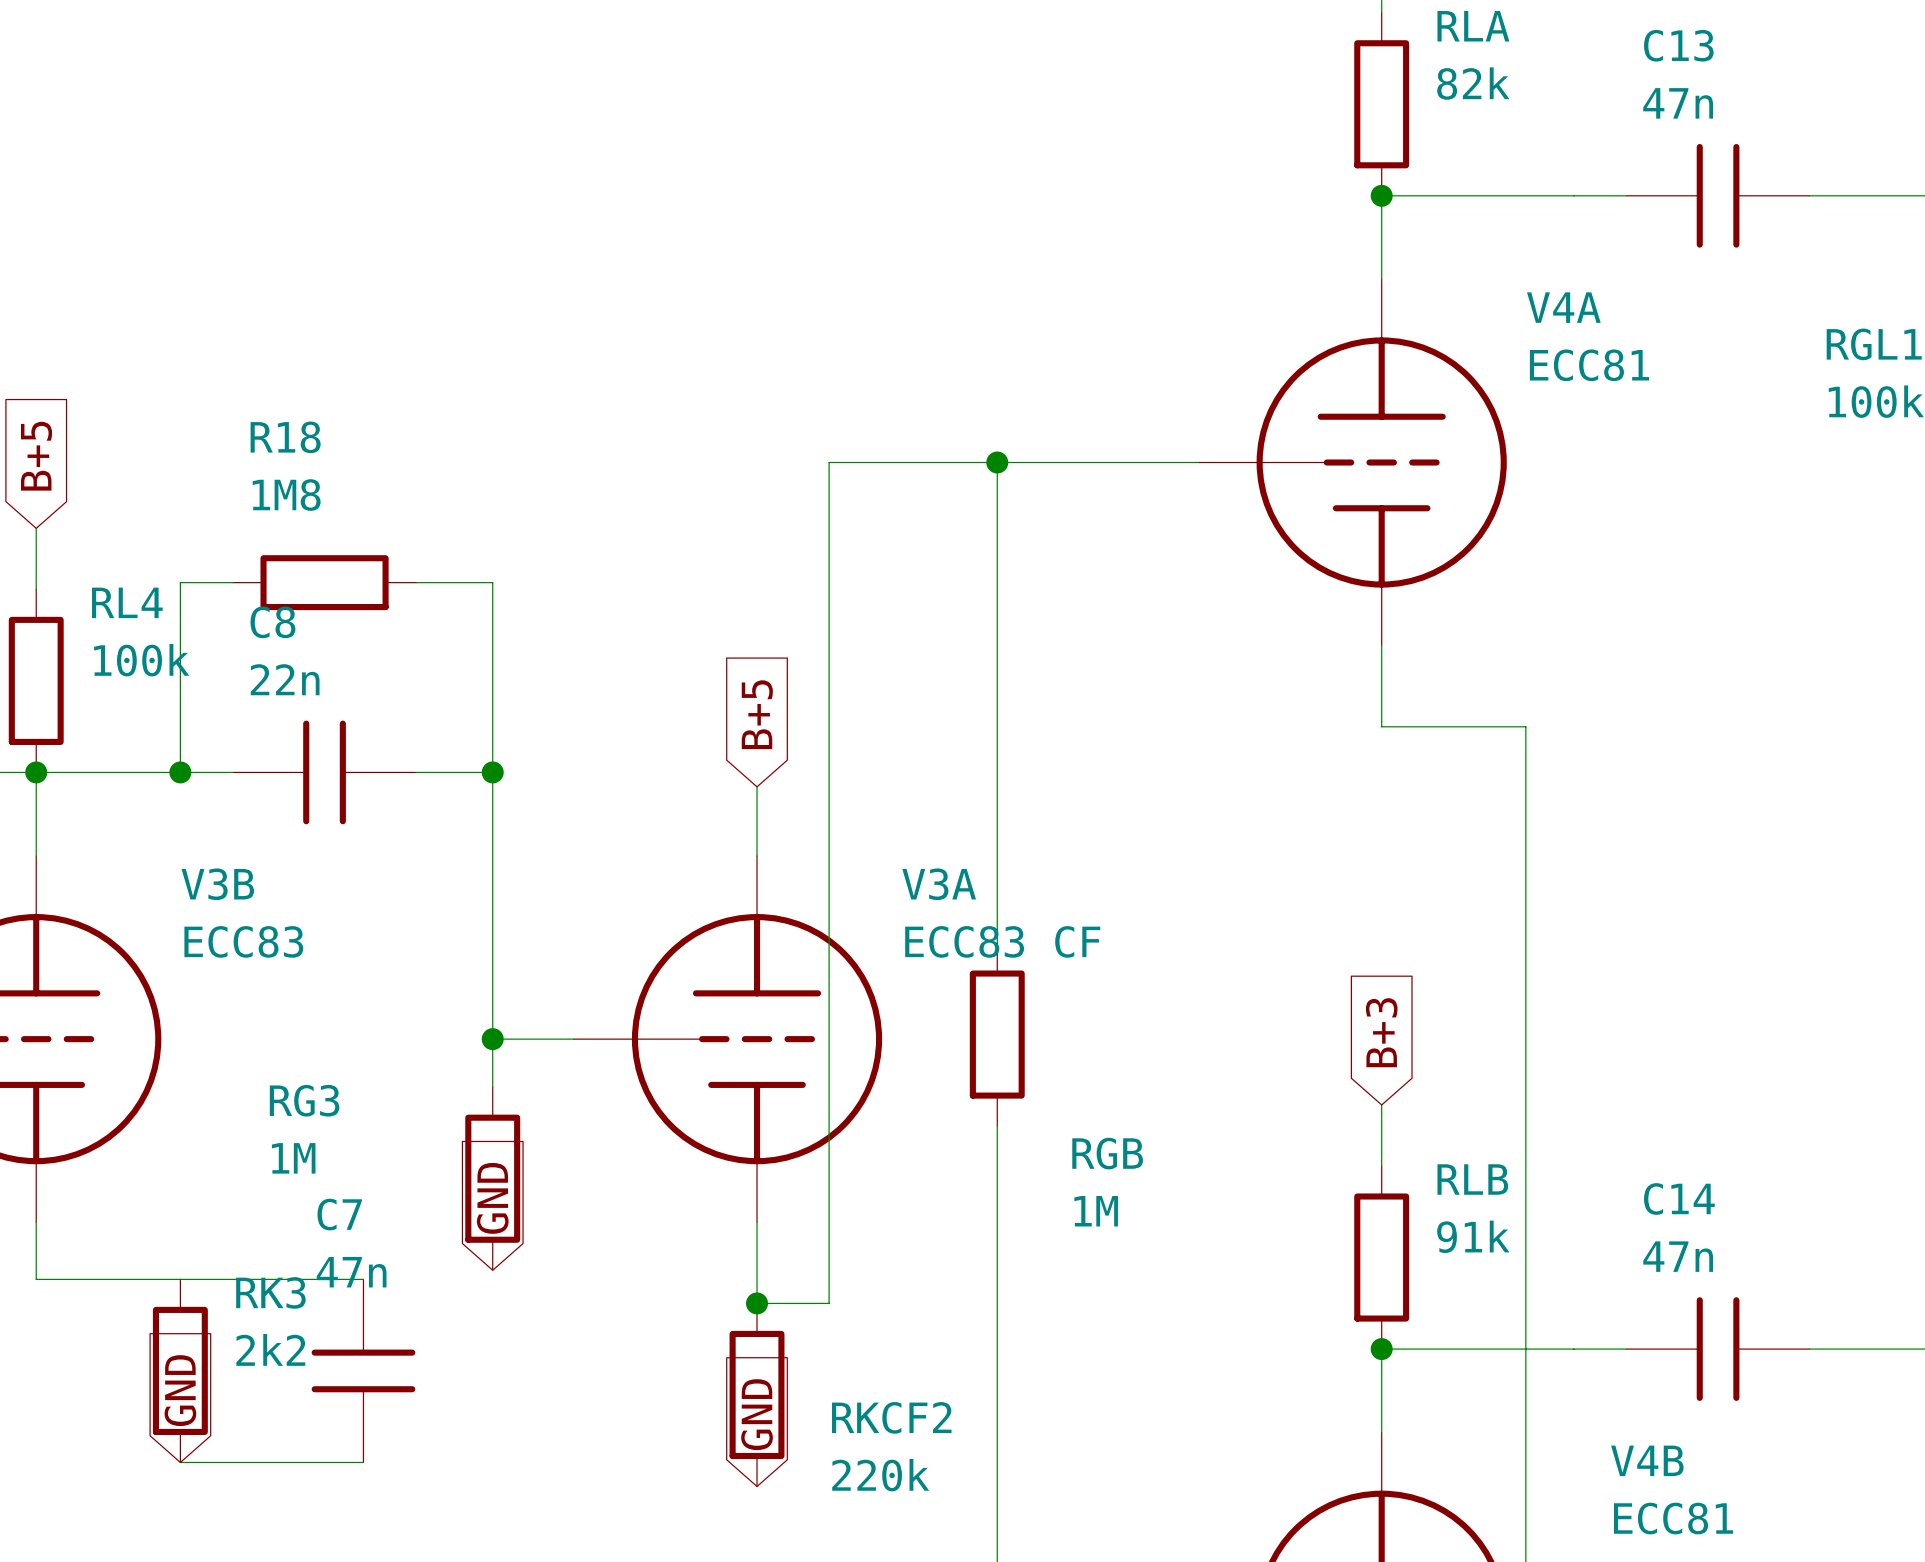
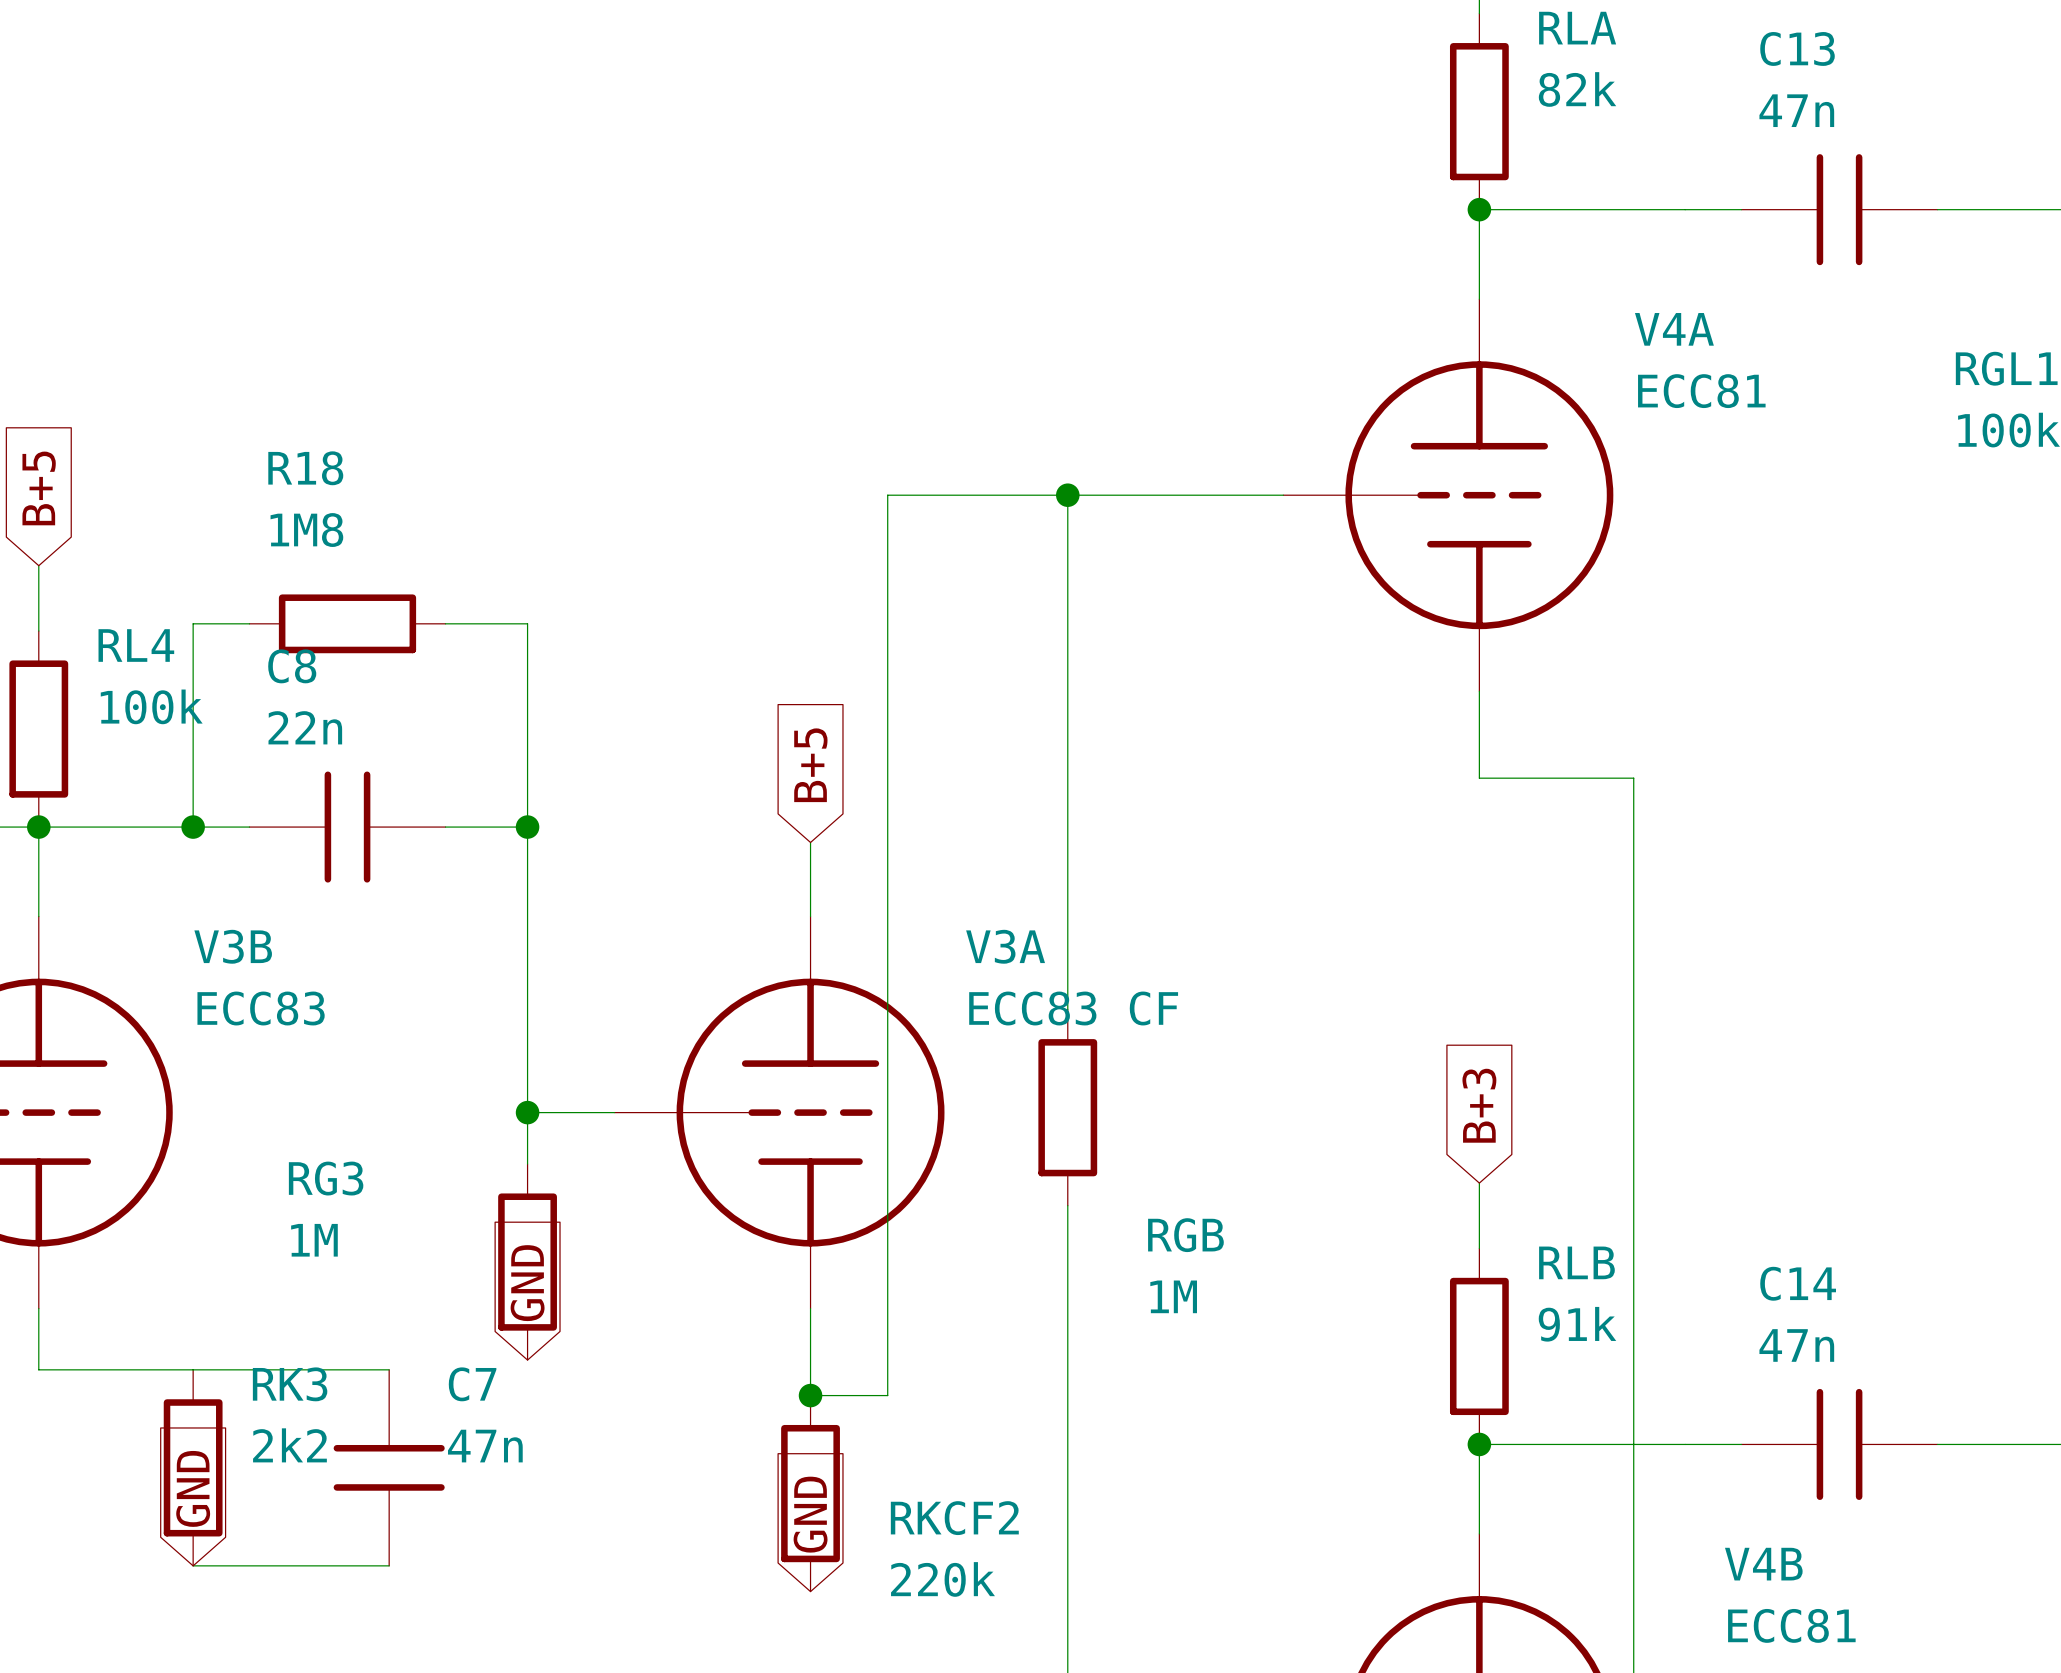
C7 name position: C7 (339, 1214) -> C7 (472, 1384)
C7 value position: 47n (351, 1272) -> 47n (485, 1446)

